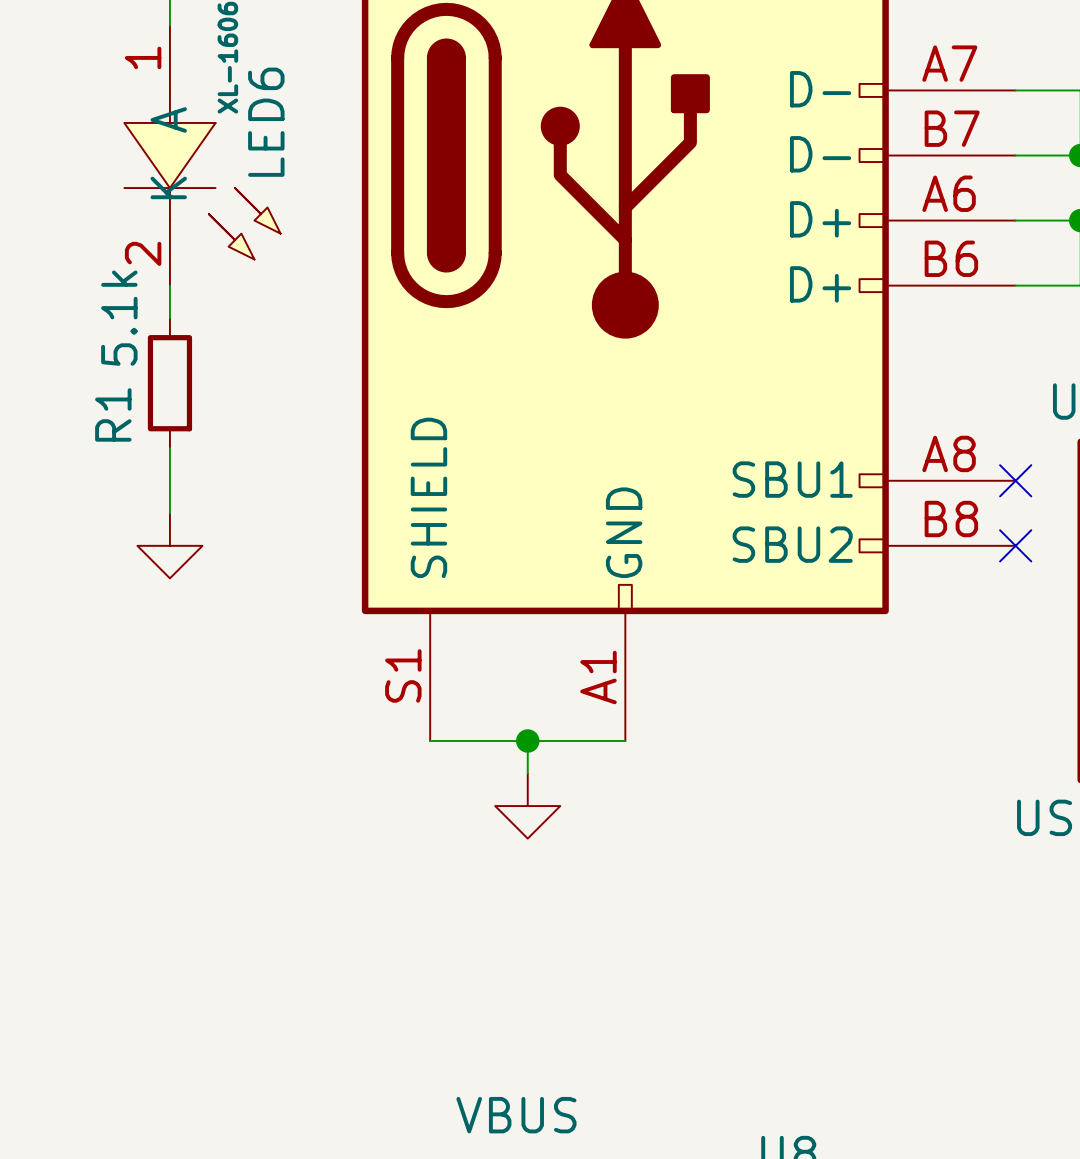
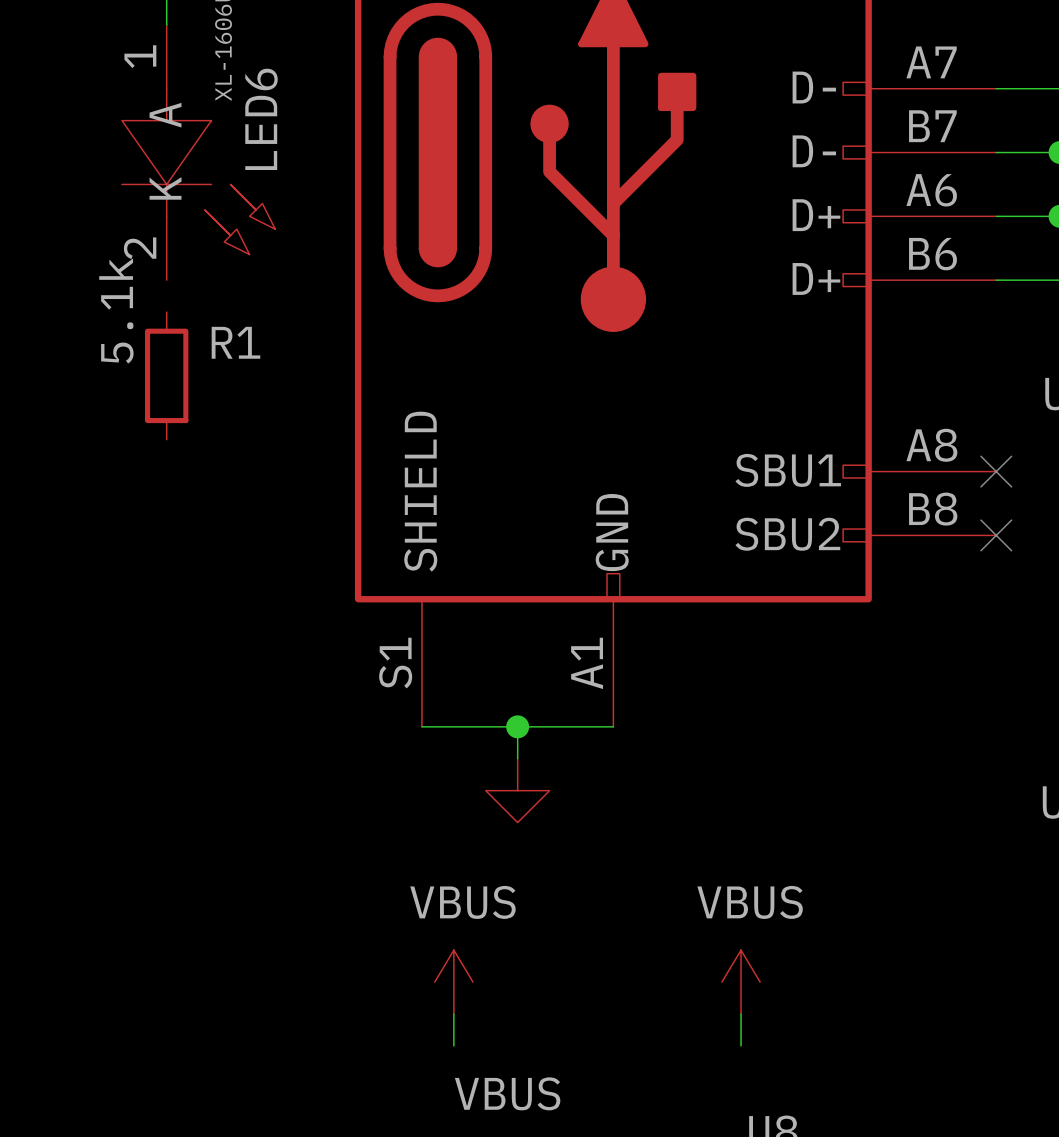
wire: (169, 285) (169, 318) -> none
R1 name rotation: 0° (113, 414) -> 90° clockwise (235, 342)
R1 name position: R1 (113, 414) -> R1 (235, 342)
wire: (169, 448) (169, 513) -> none
power symbol: (169, 545) -> none
power symbol: none -> VBUS (453, 982)
power symbol: none -> VBUS (741, 982)
wire: none -> (453, 1014) (453, 1045)
wire: none -> (741, 1014) (741, 1045)

